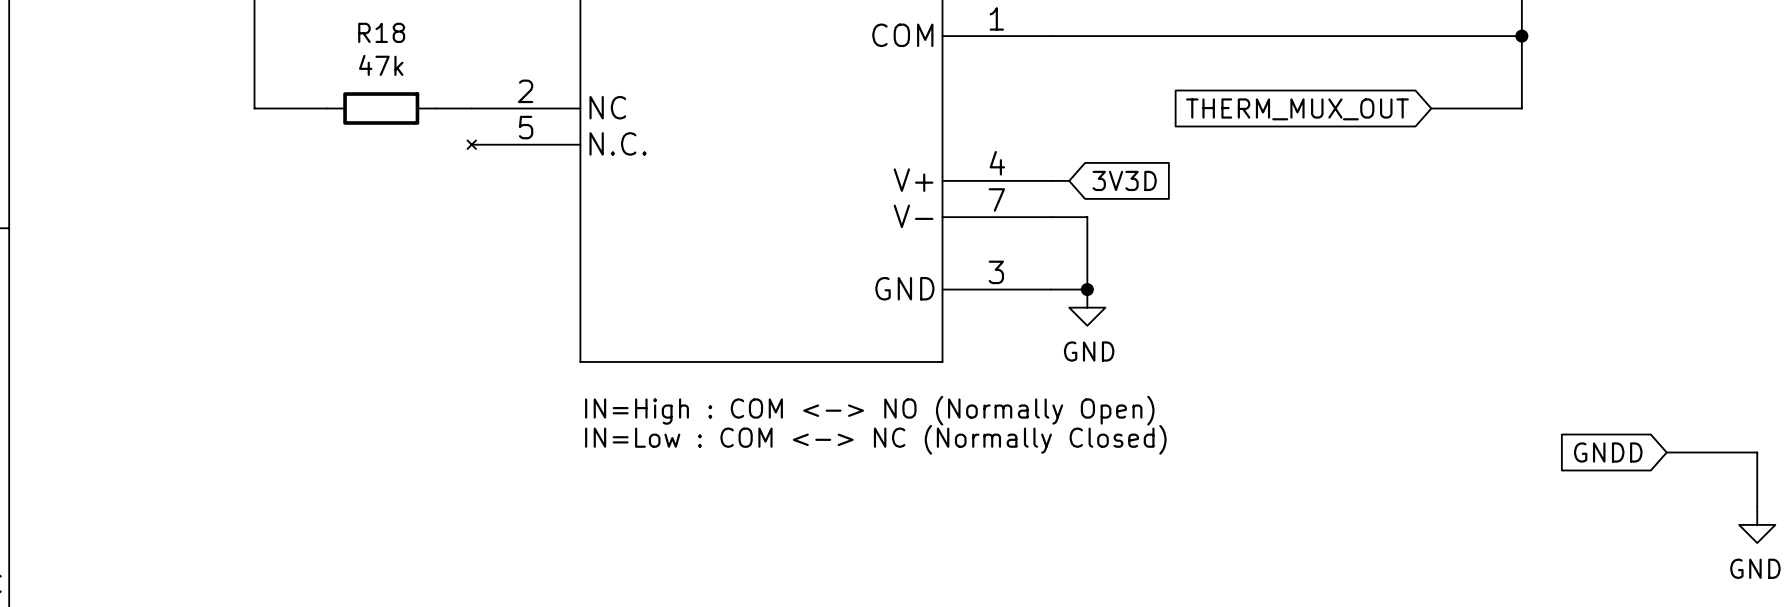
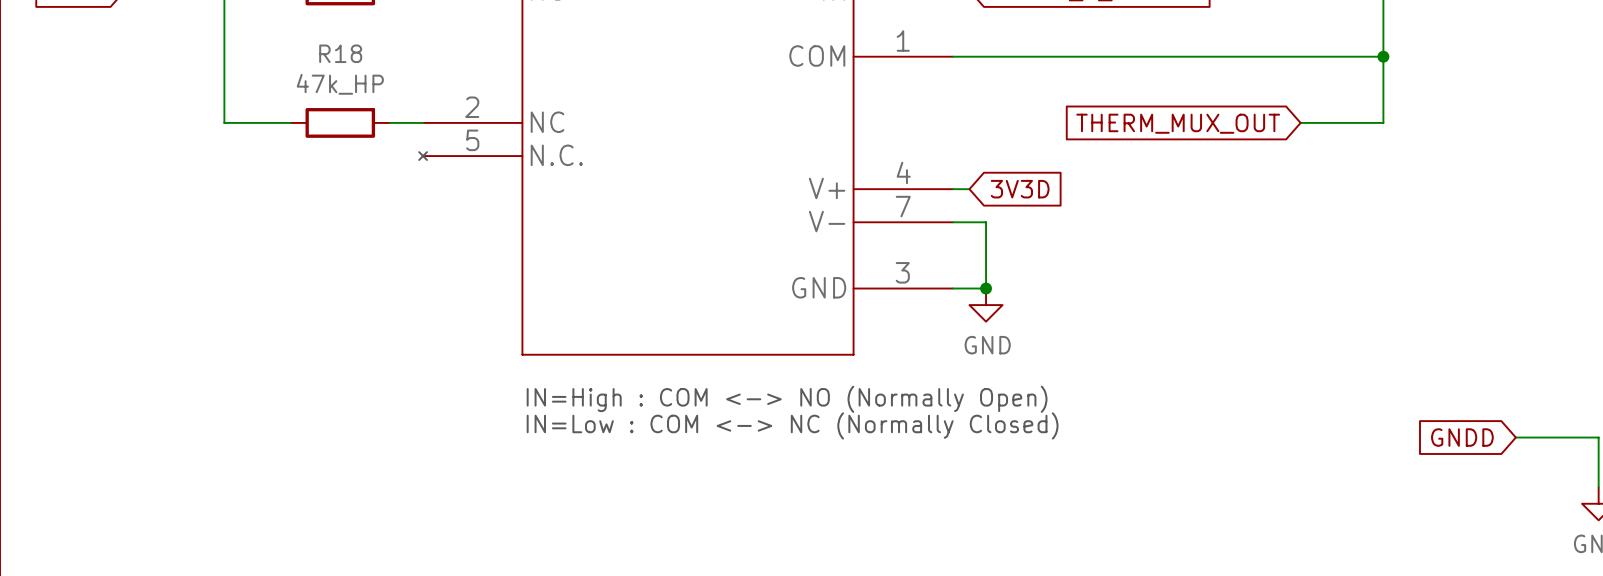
R18 value: 47k (381, 65) -> 47k_HP (340, 84)

